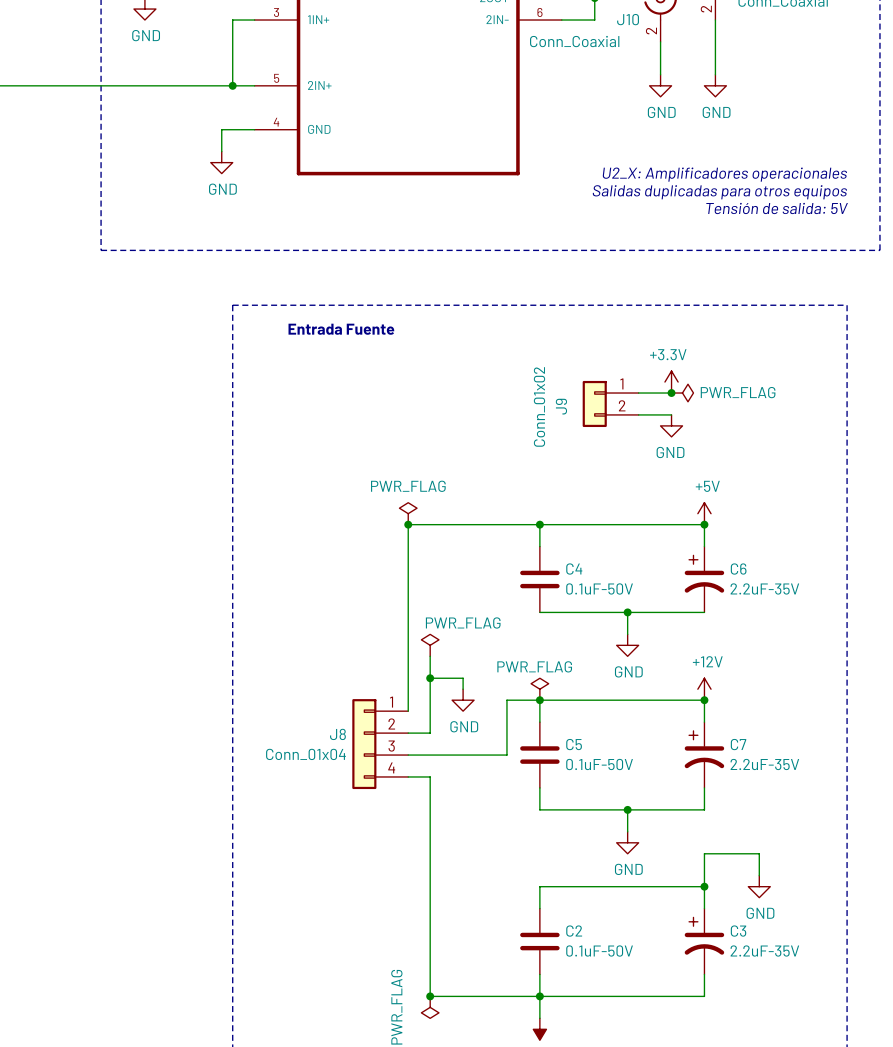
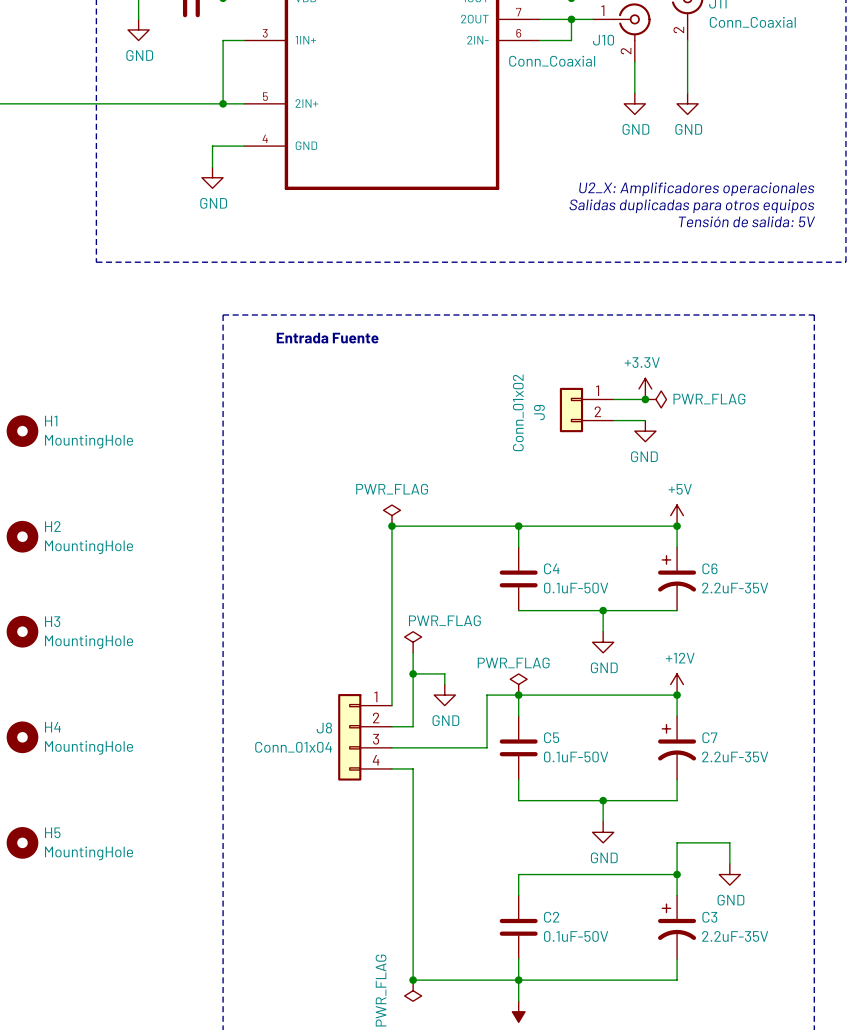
H1: none -> MountingHole (22, 431)
H2: none -> MountingHole (22, 536)
H3: none -> MountingHole (22, 631)
H4: none -> MountingHole (22, 737)
H5: none -> MountingHole (22, 842)

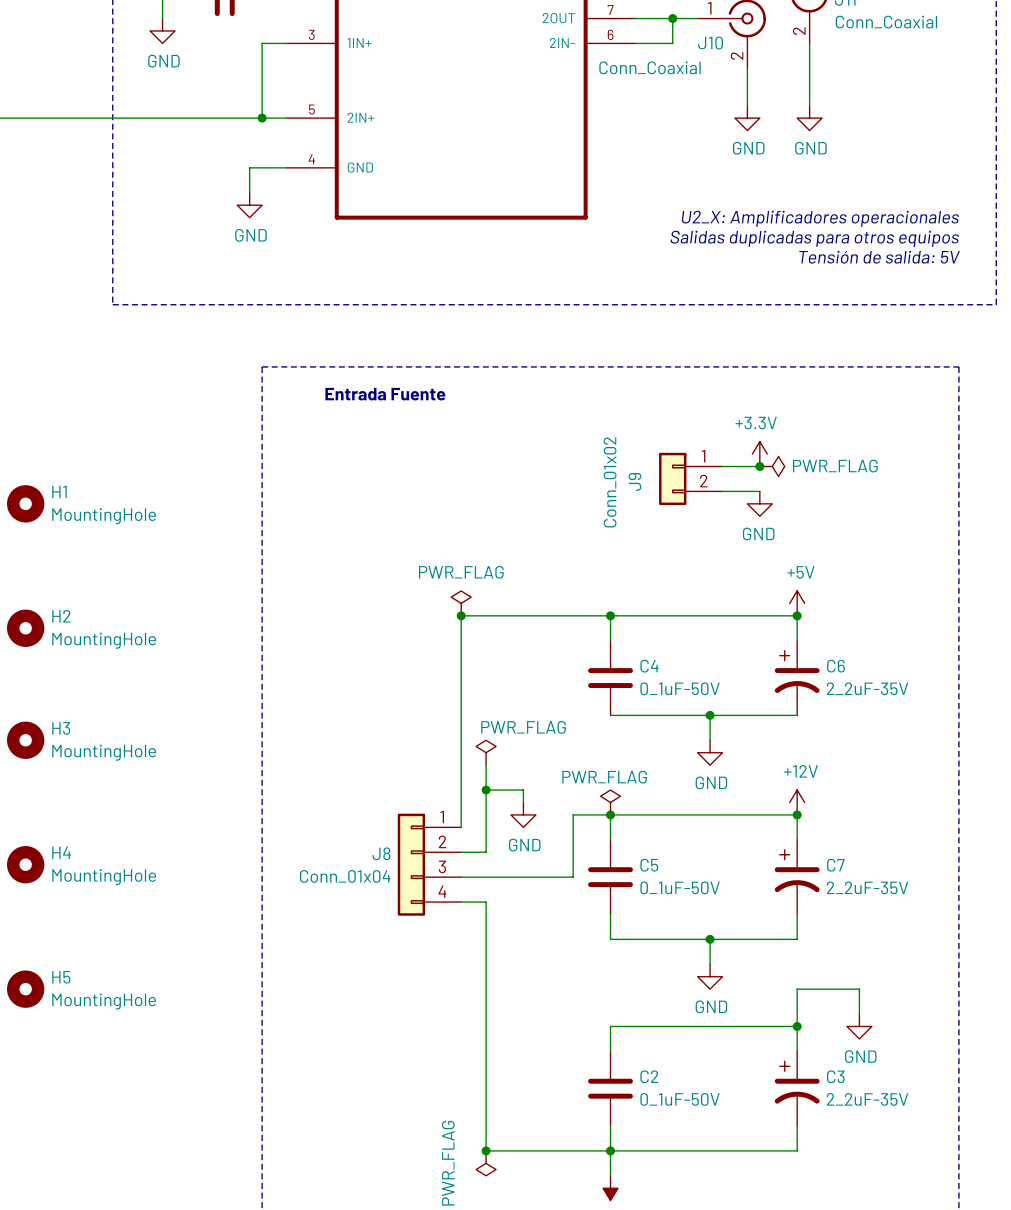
C4 value: 0.1uF-50V (576, 588) -> 0_1uF-50V (680, 688)
C6 value: 2.2uF-35V (735, 588) -> 2_2uF-35V (867, 688)
C5 value: 0.1uF-50V (576, 756) -> 0_1uF-50V (680, 887)
C7 value: 2.2uF-35V (735, 756) -> 2_2uF-35V (867, 887)
C2 value: 0.1uF-50V (576, 936) -> 0_1uF-50V (680, 1099)
C3 value: 2.2uF-35V (735, 936) -> 2_2uF-35V (867, 1099)

